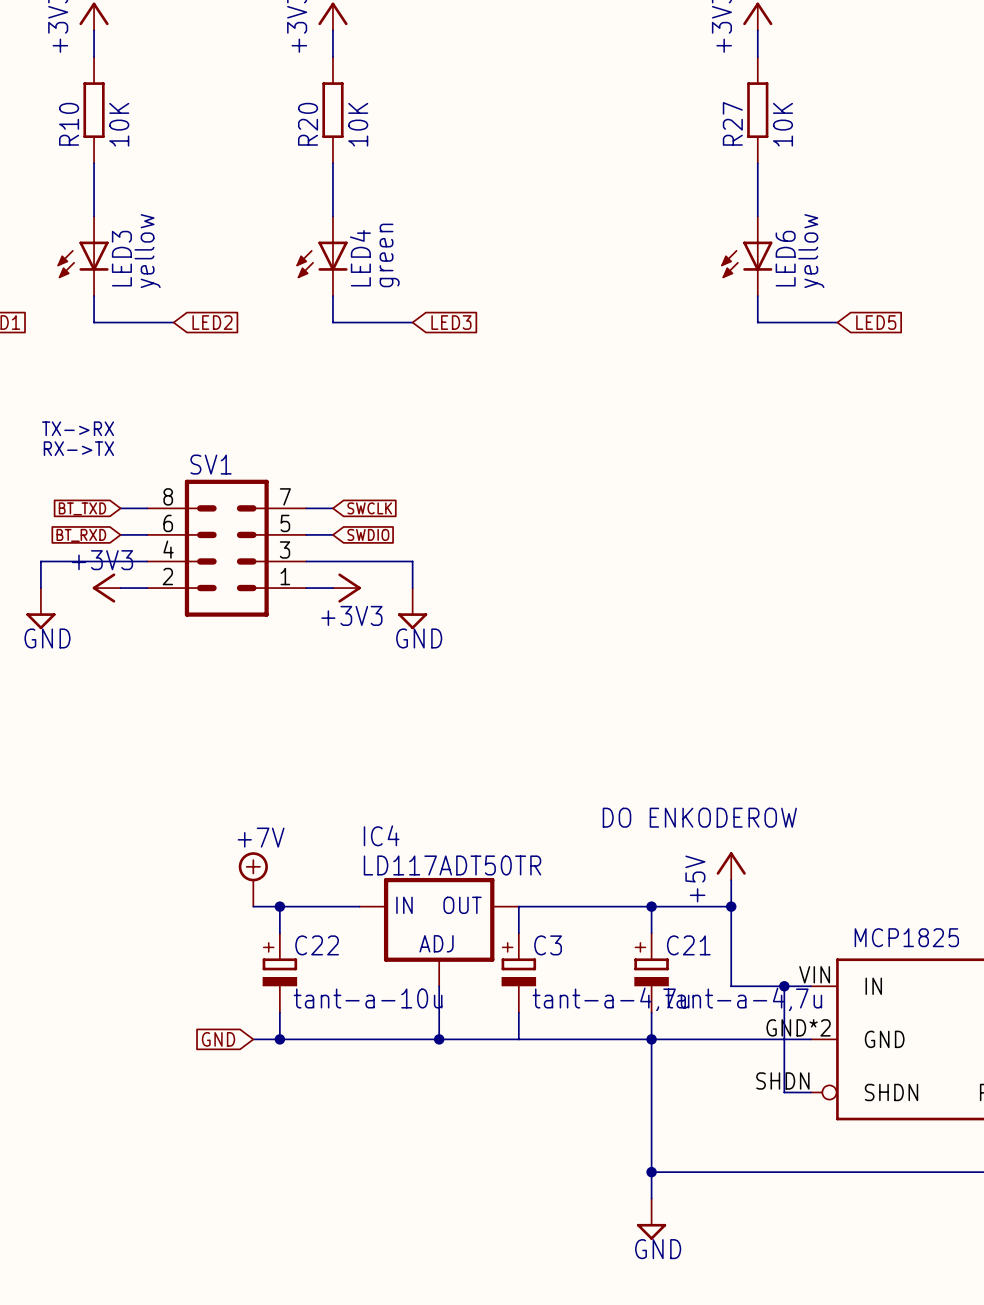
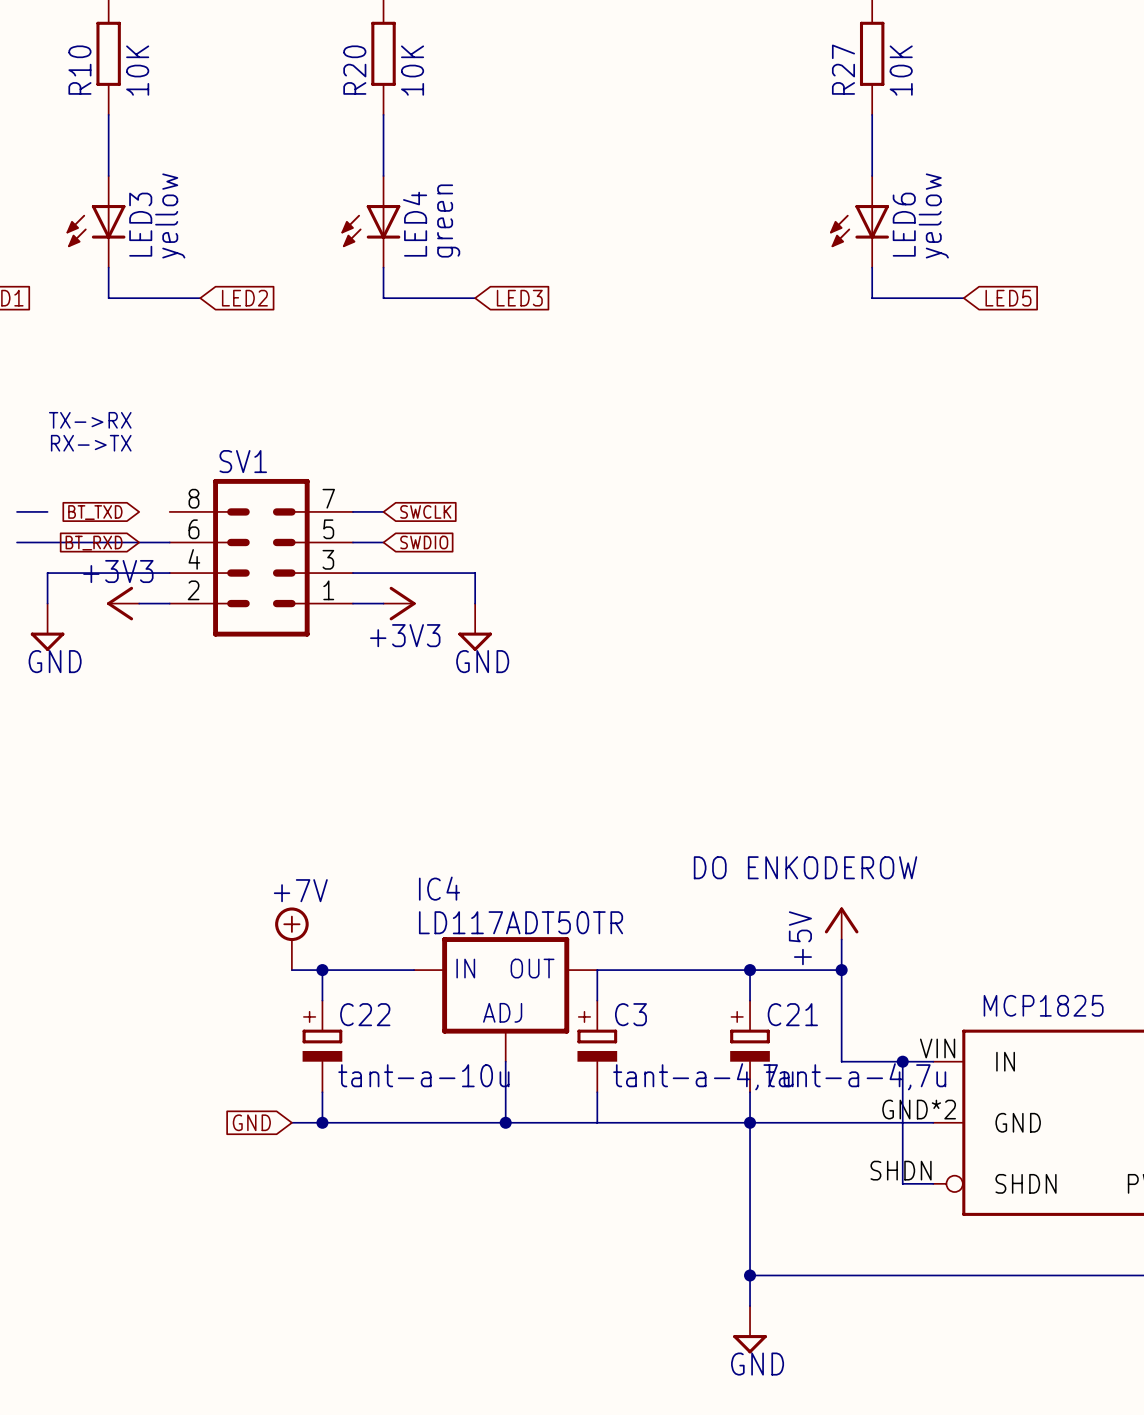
wire: (120, 508) (147, 508) -> (17, 511) (47, 511)
wire: none -> (17, 542) (139, 542)

